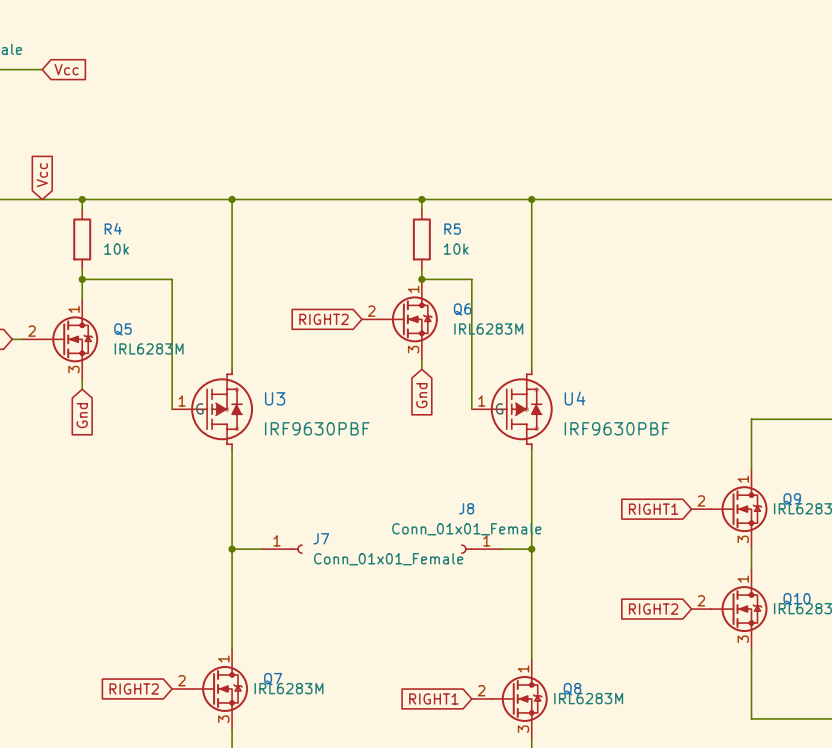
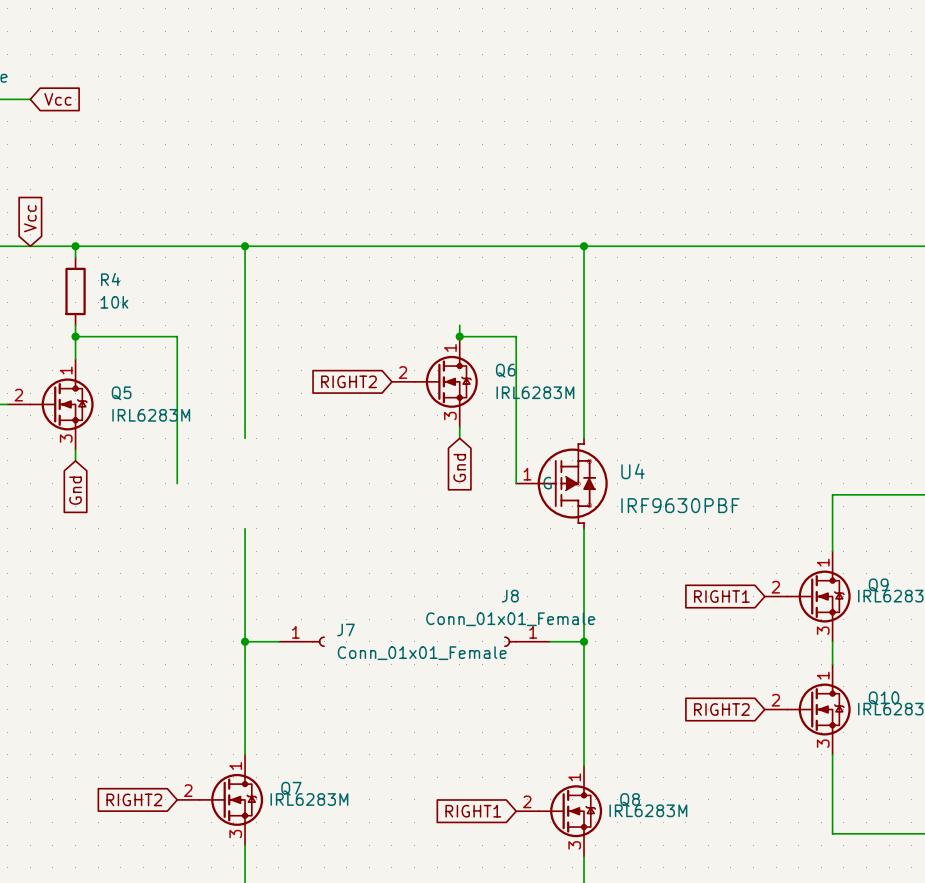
wire: (421, 199) (421, 209) -> none
junction: (421, 199) -> none
R5: 10k (421, 239) -> none
U3: IRF9630PBF (212, 409) -> none

